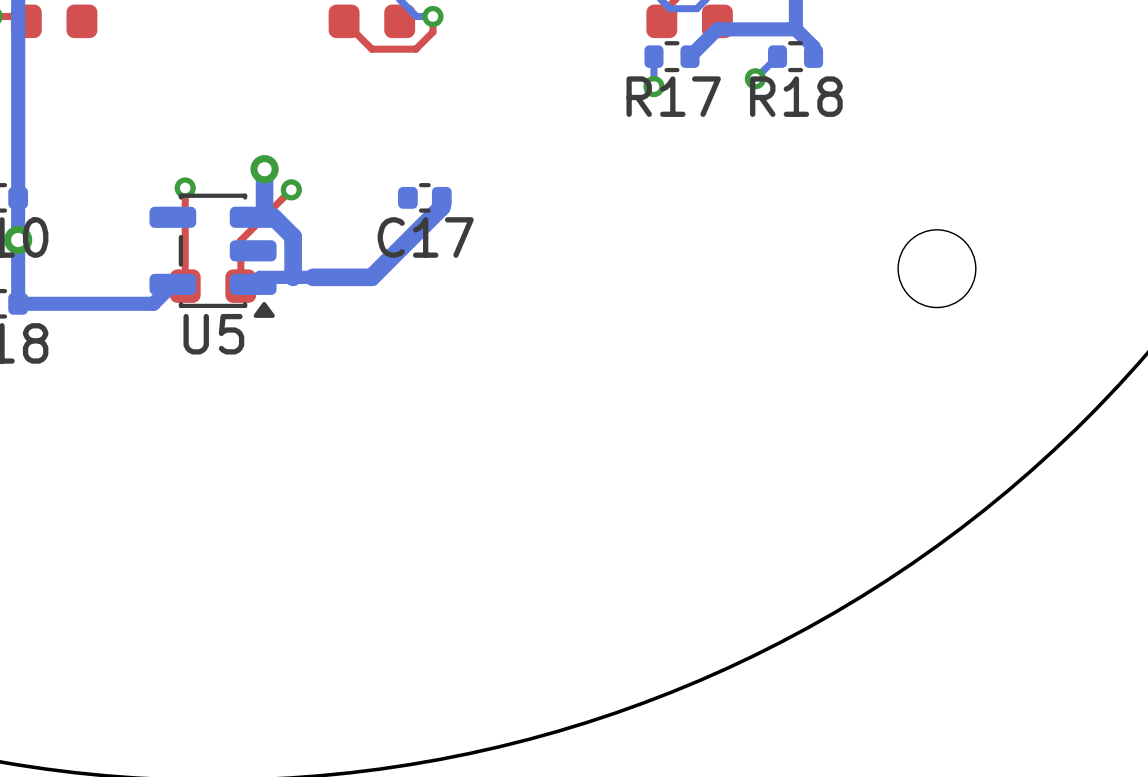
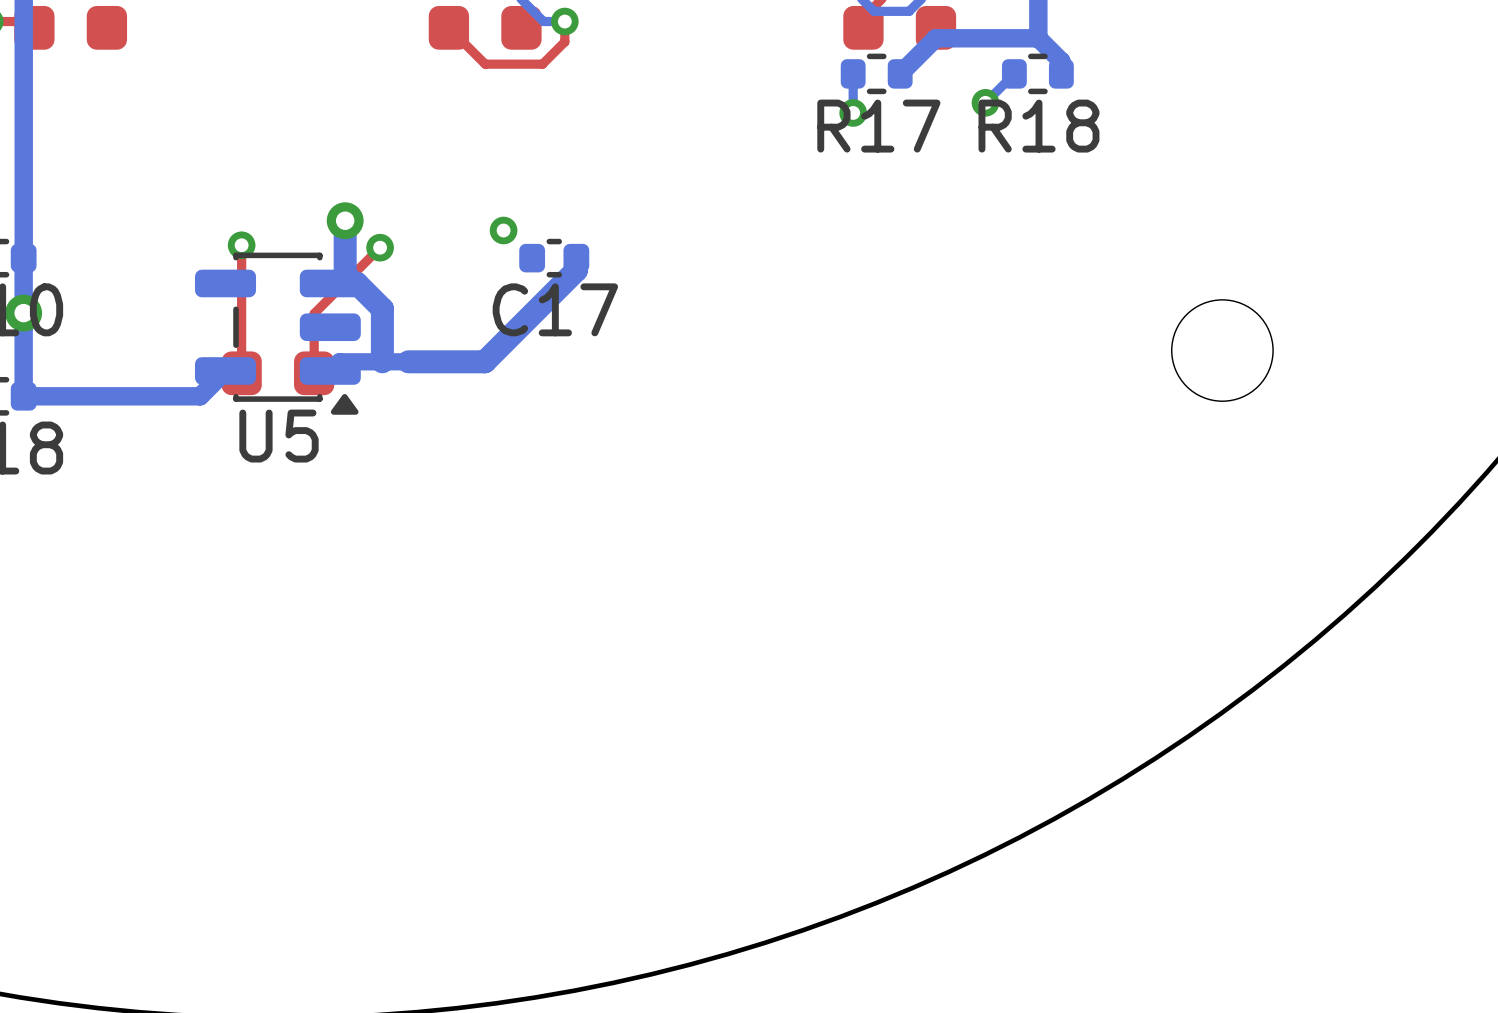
via: none -> (503, 230)

